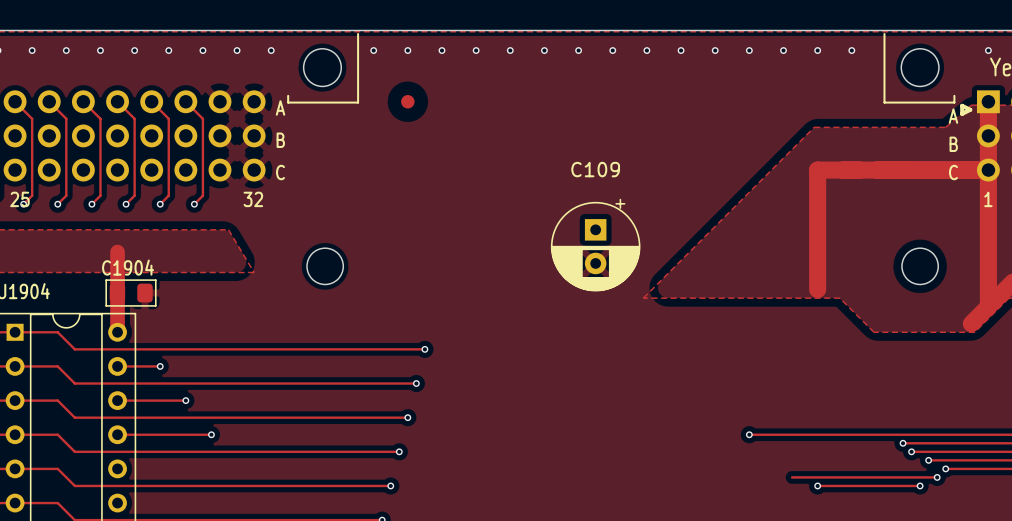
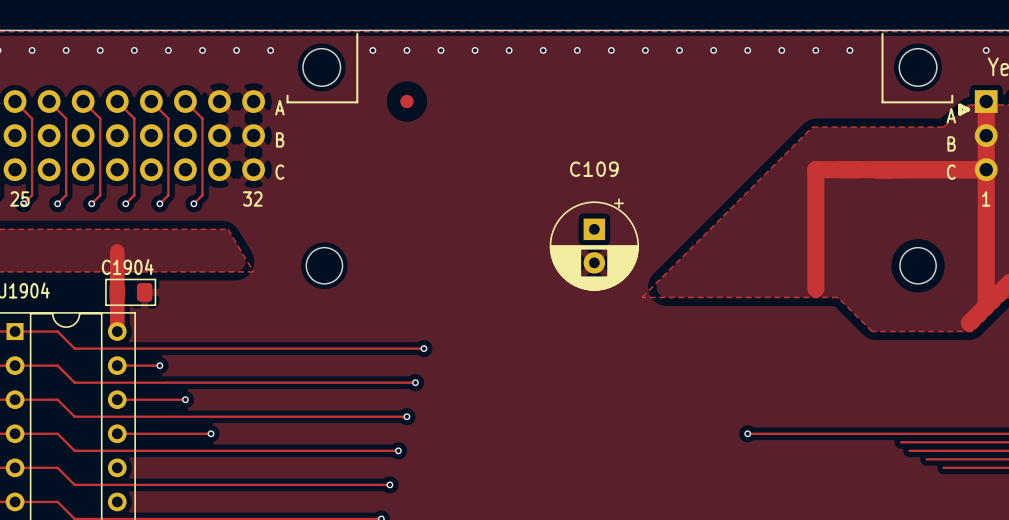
via: (903, 443) -> none
via: (911, 451) -> none
via: (928, 460) -> none
via: (945, 468) -> none
track: (792, 477) (937, 477) -> none
via: (937, 477) -> none
track: (817, 485) (920, 485) -> none
via: (817, 485) -> none
via: (920, 485) -> none

